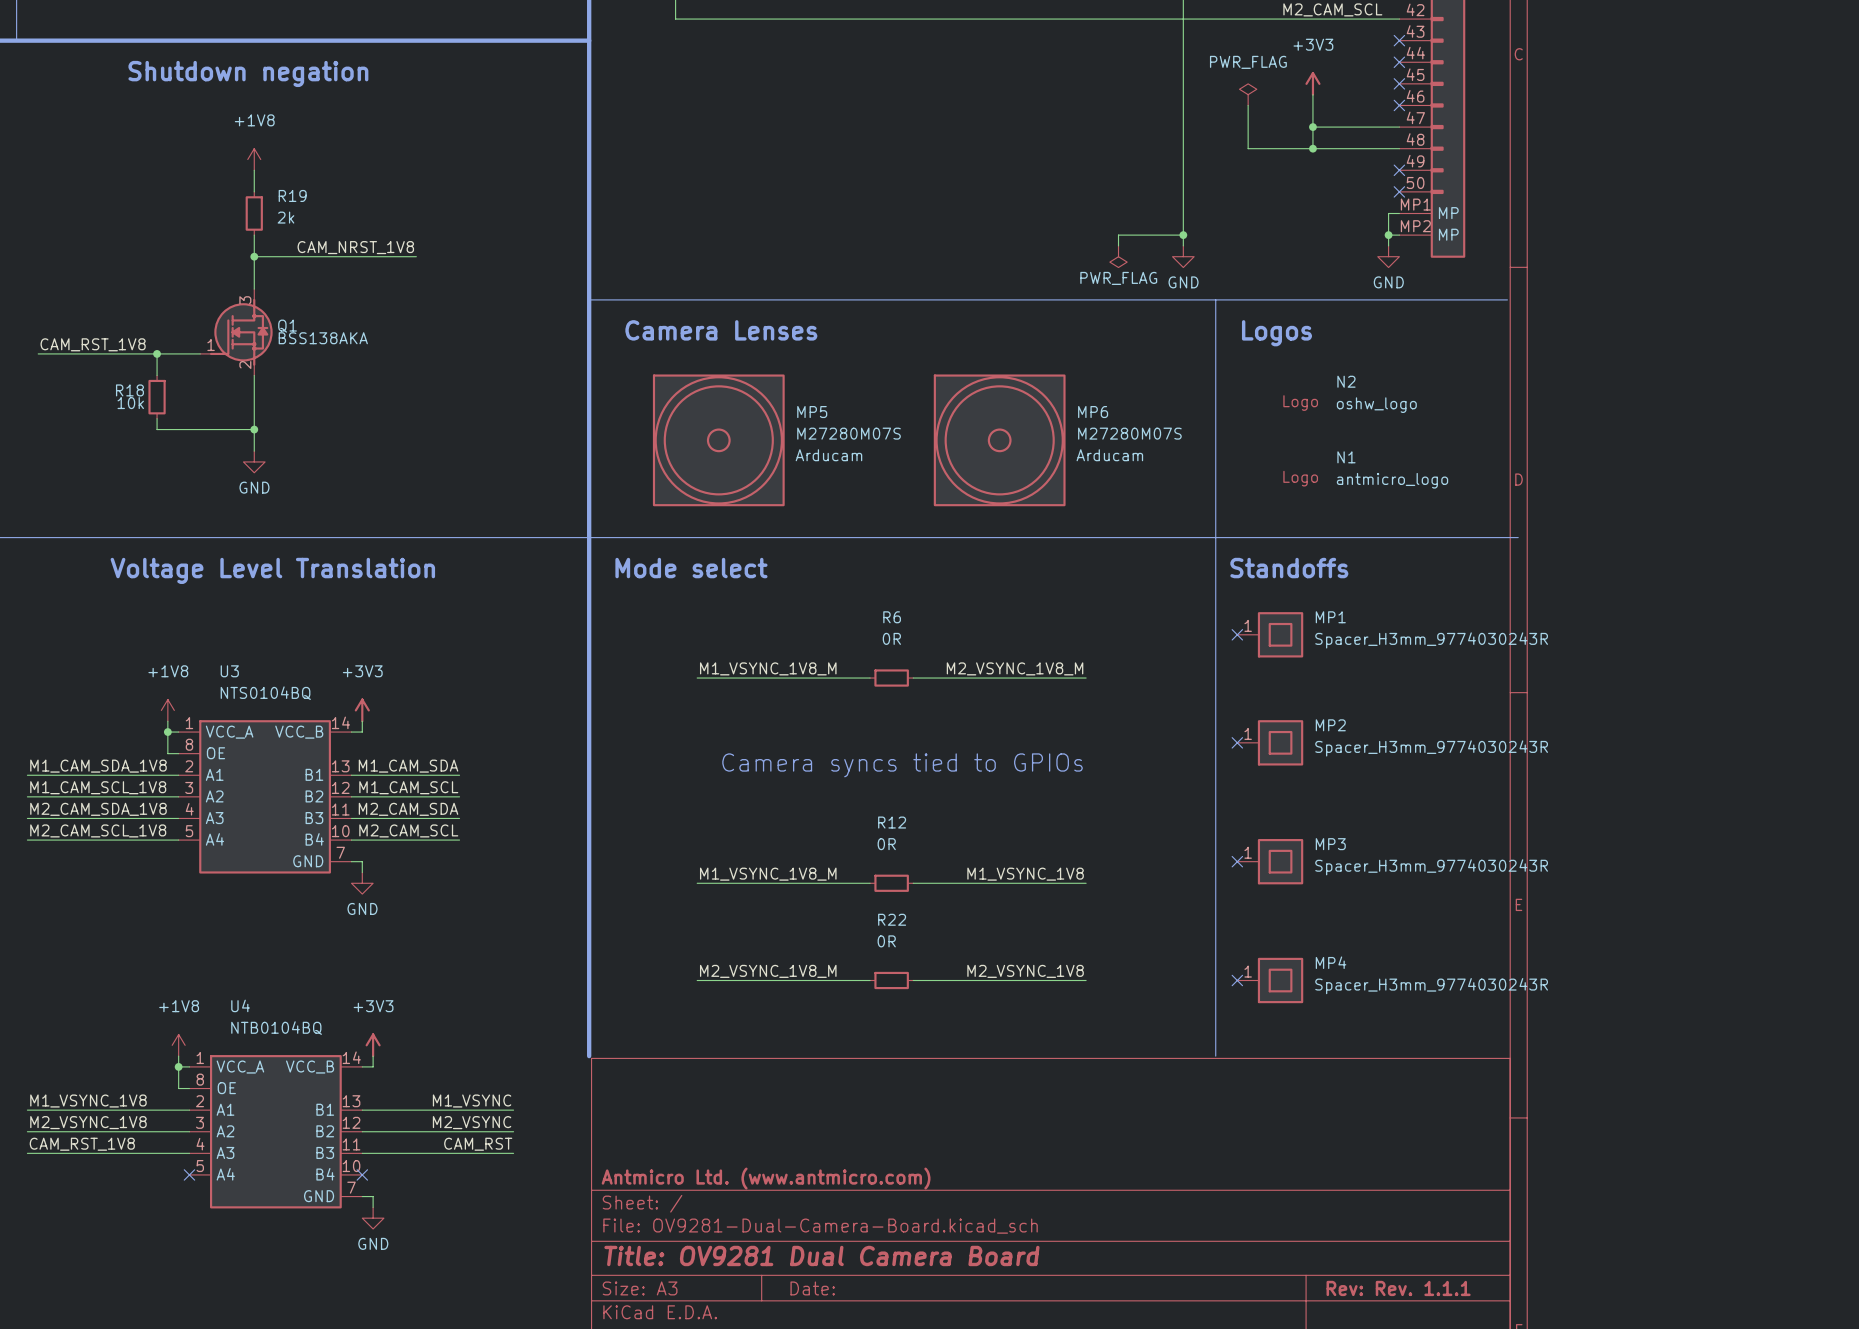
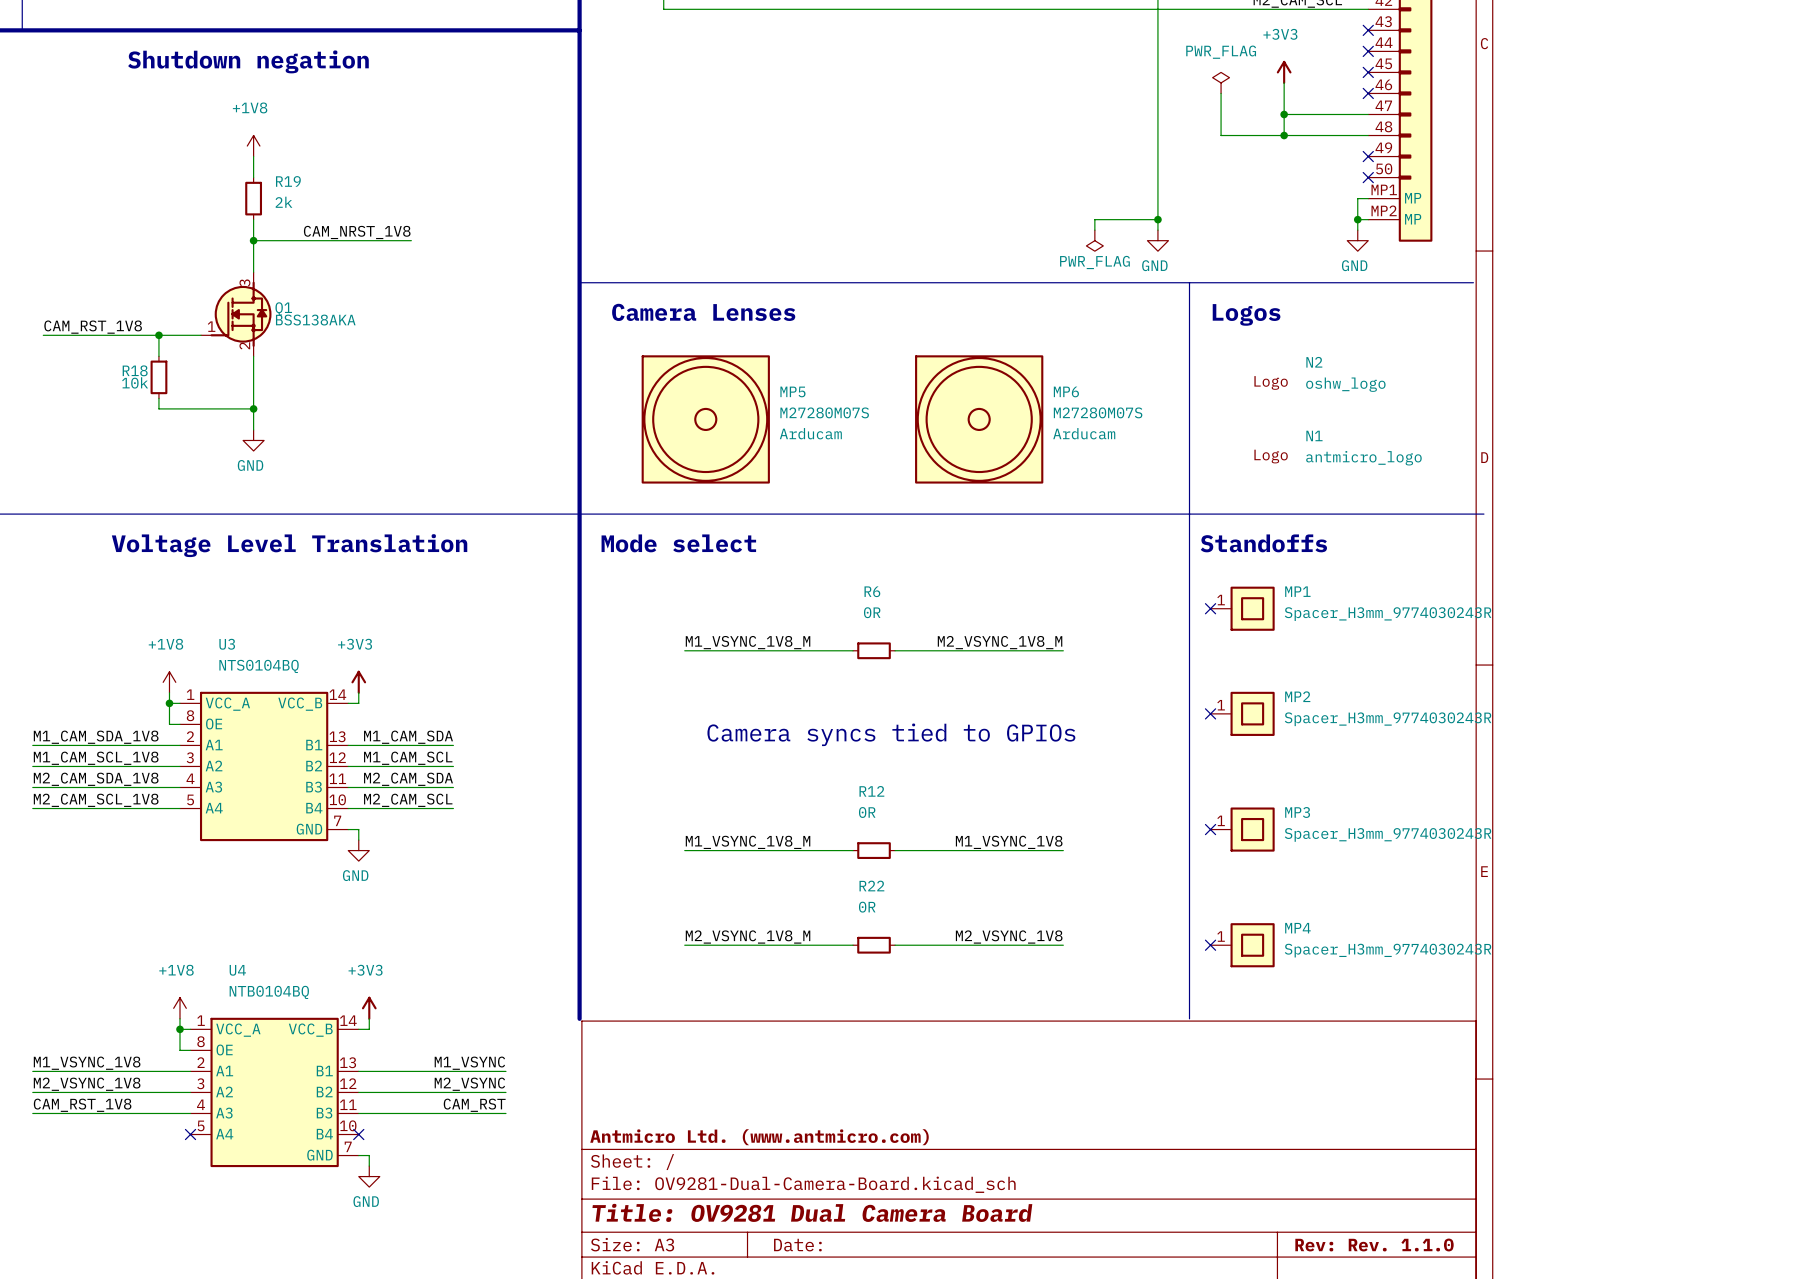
title block: Rev: Rev. 1.1.1 (1398, 1288) -> Rev: Rev. 1.1.0 (1374, 1245)

